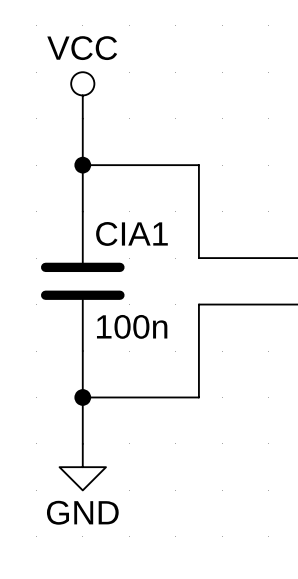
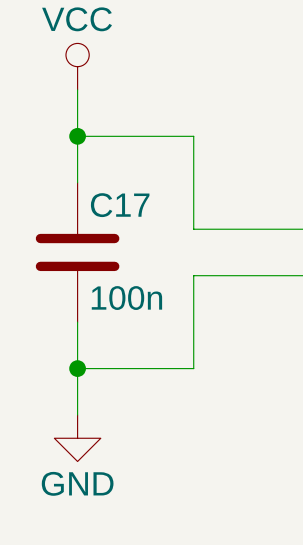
CIA1 name: CIA1 (131, 233) -> C17 (120, 205)

